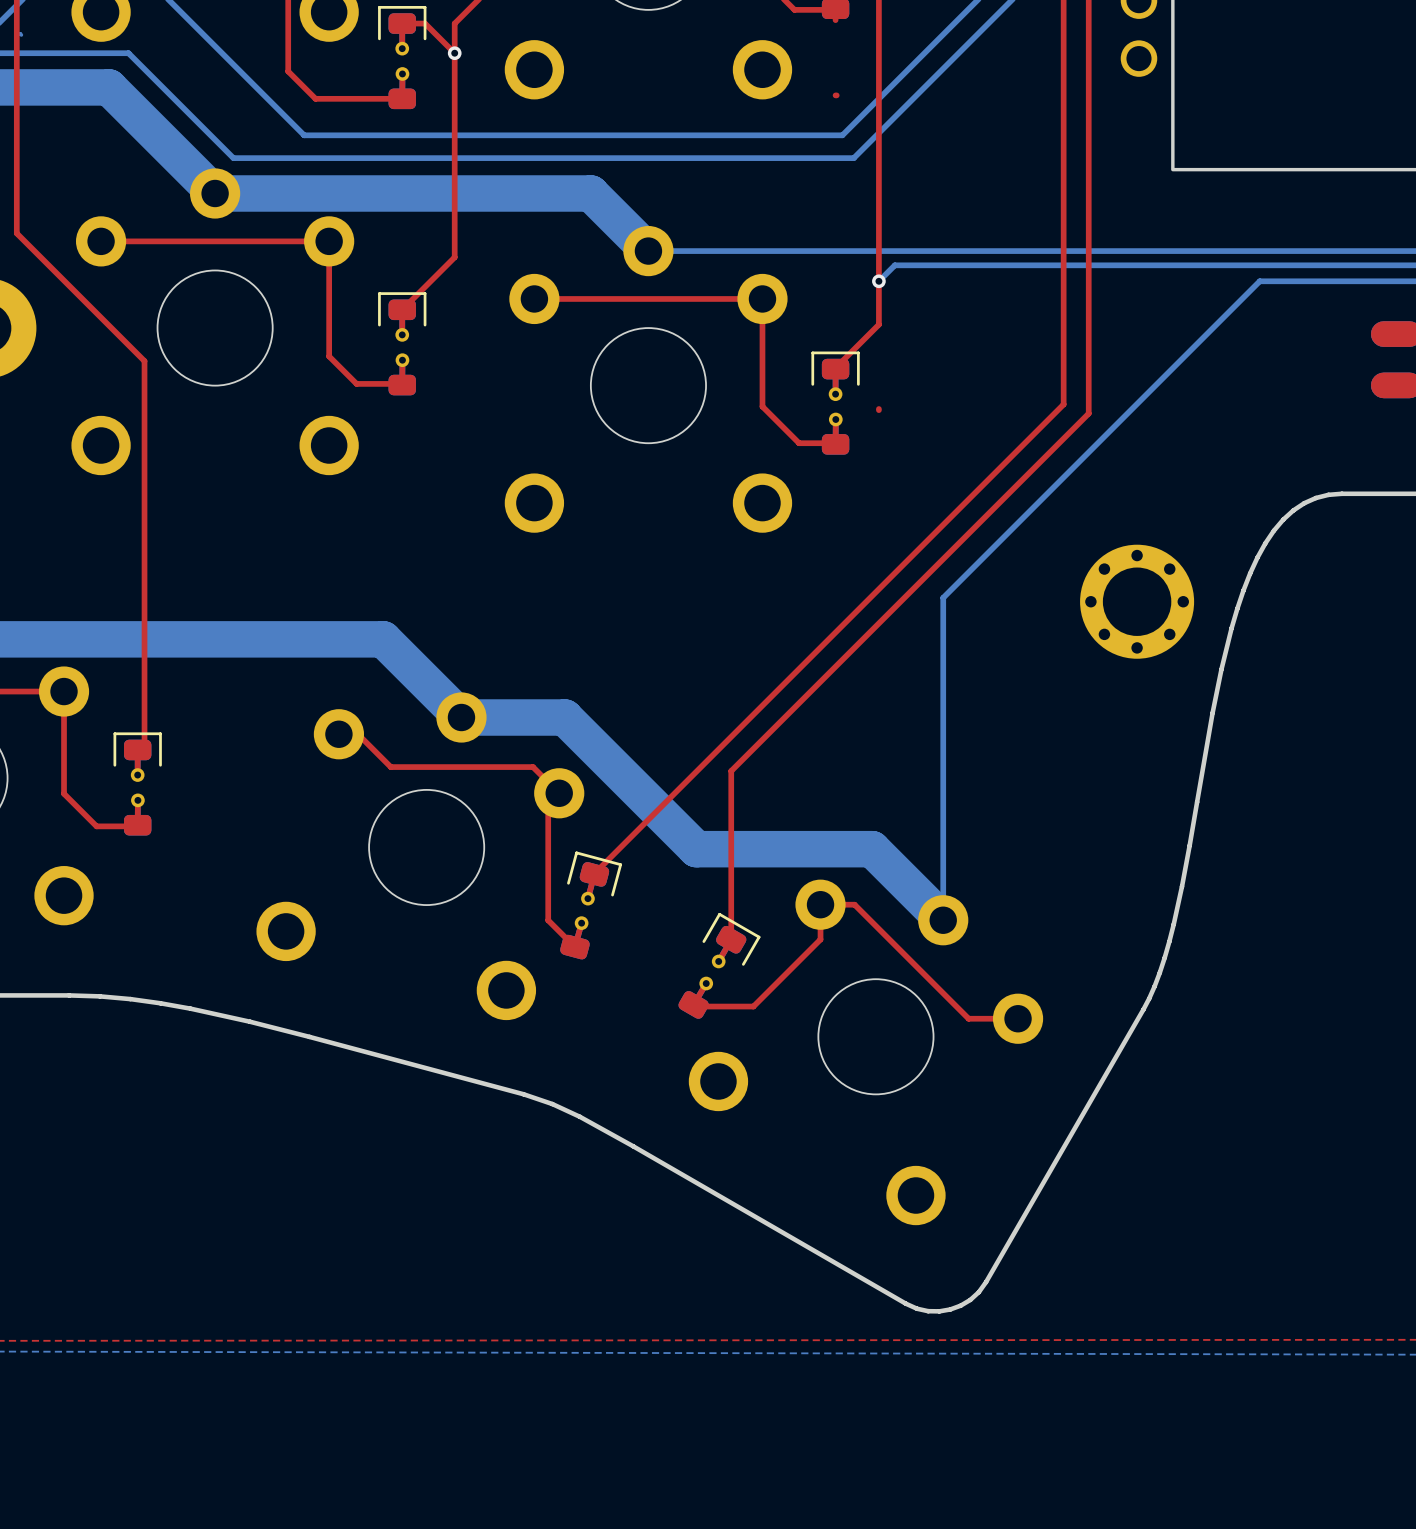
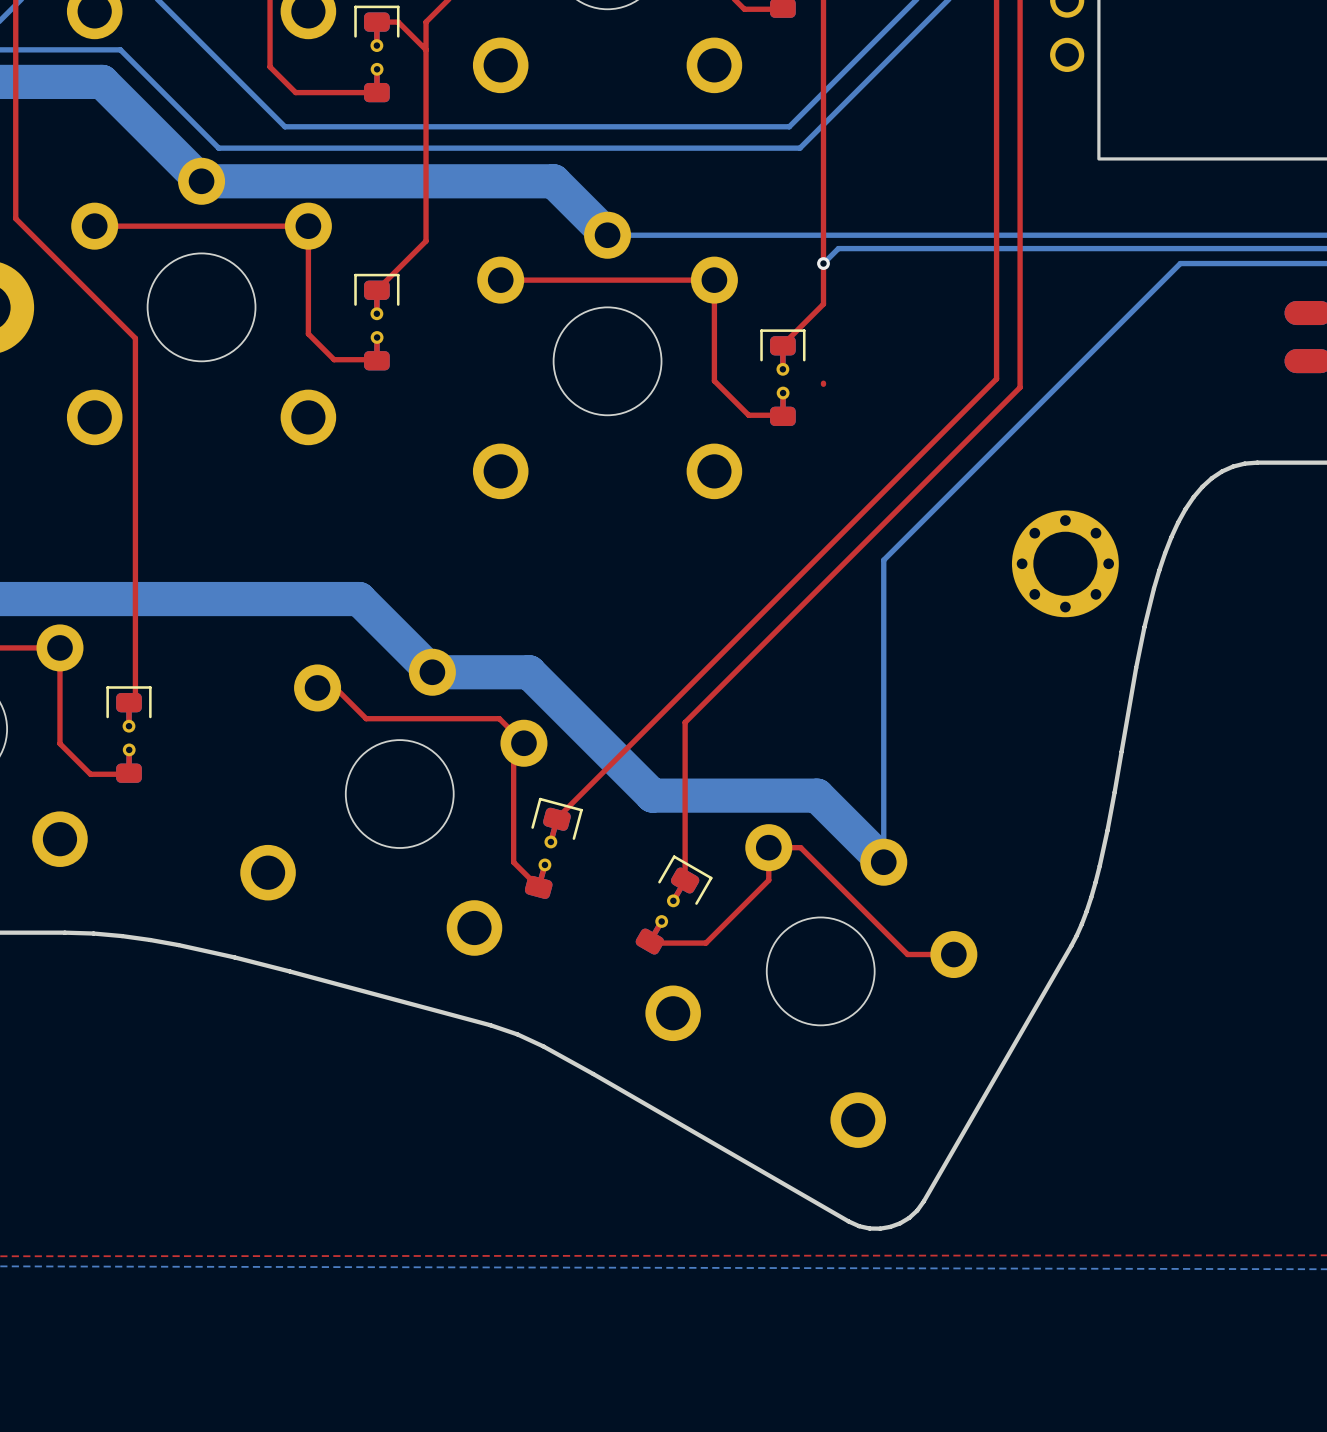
top track: (835, 19) (835, 20) -> none
bottom track: (16, 33) (21, 34) -> none
via: (454, 53) -> none
top track: (835, 95) (836, 95) -> none

